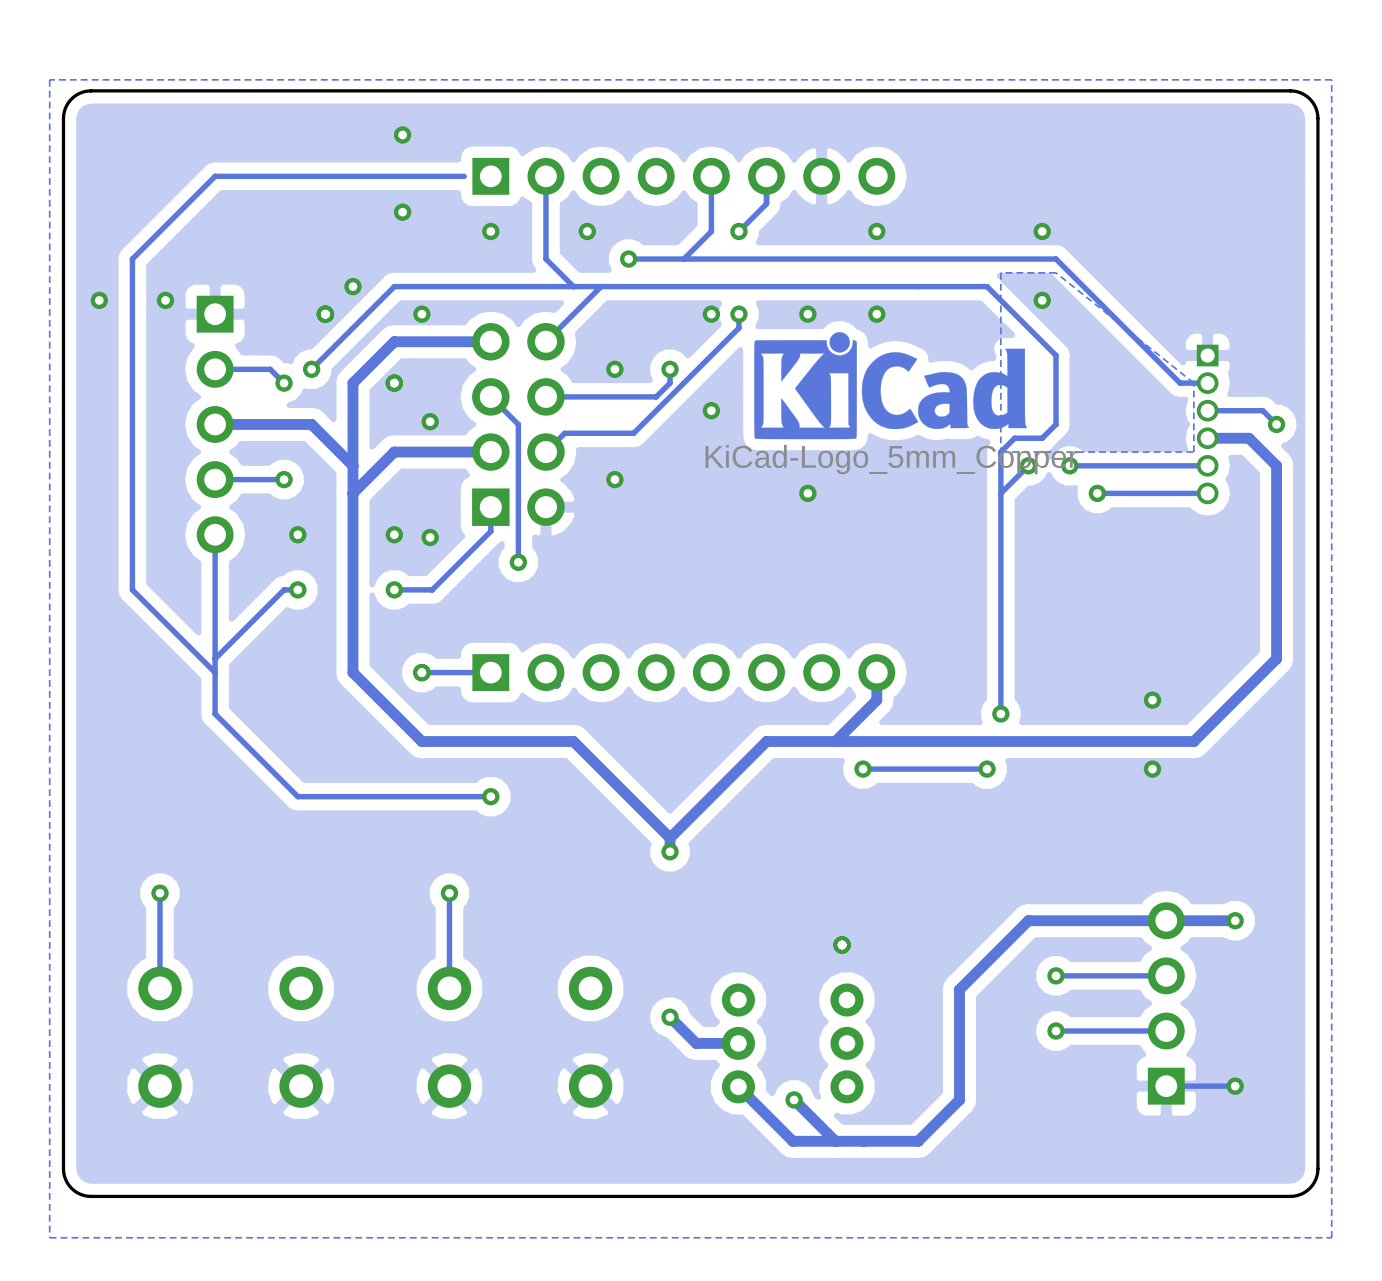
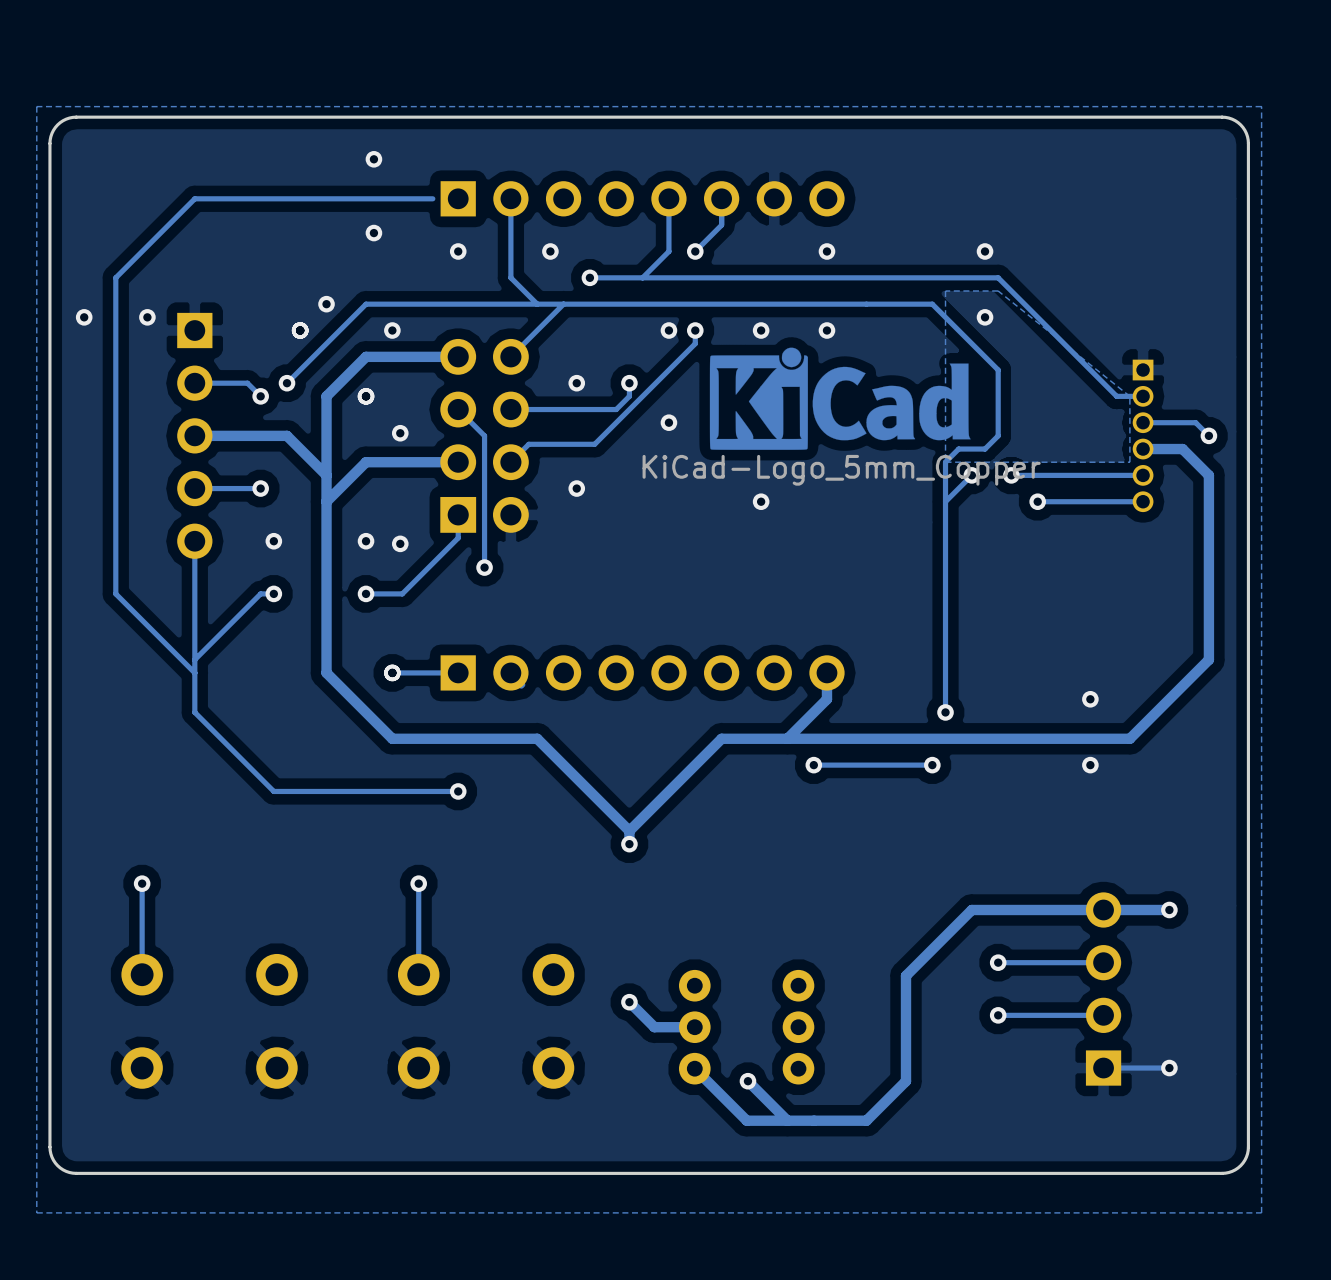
via: (842, 944) -> none

